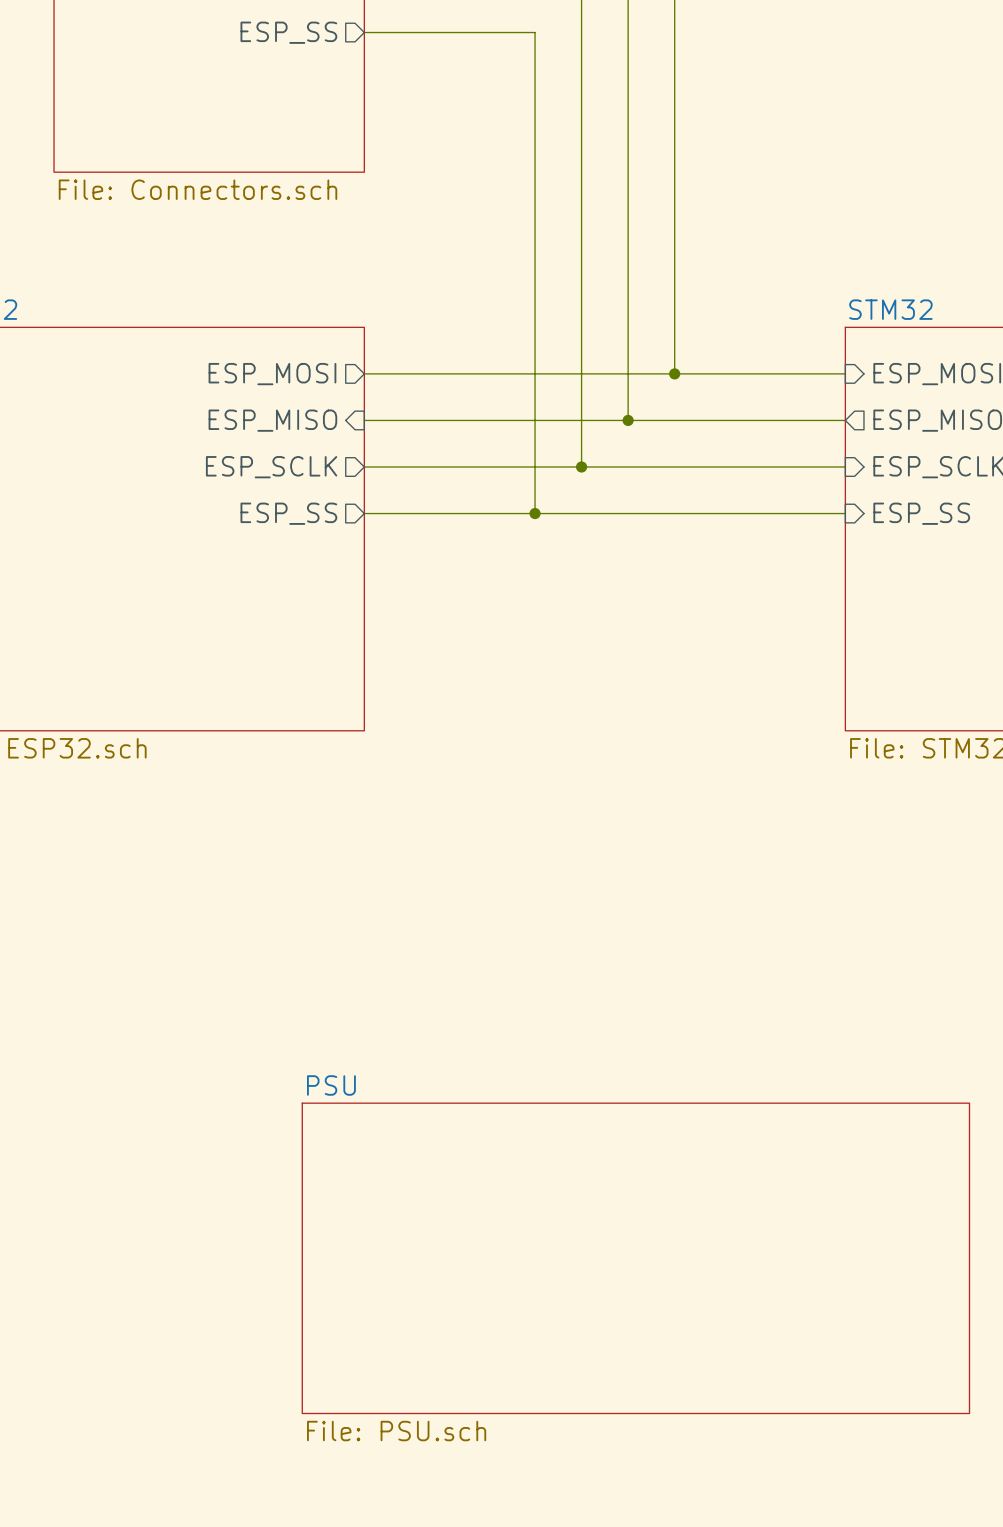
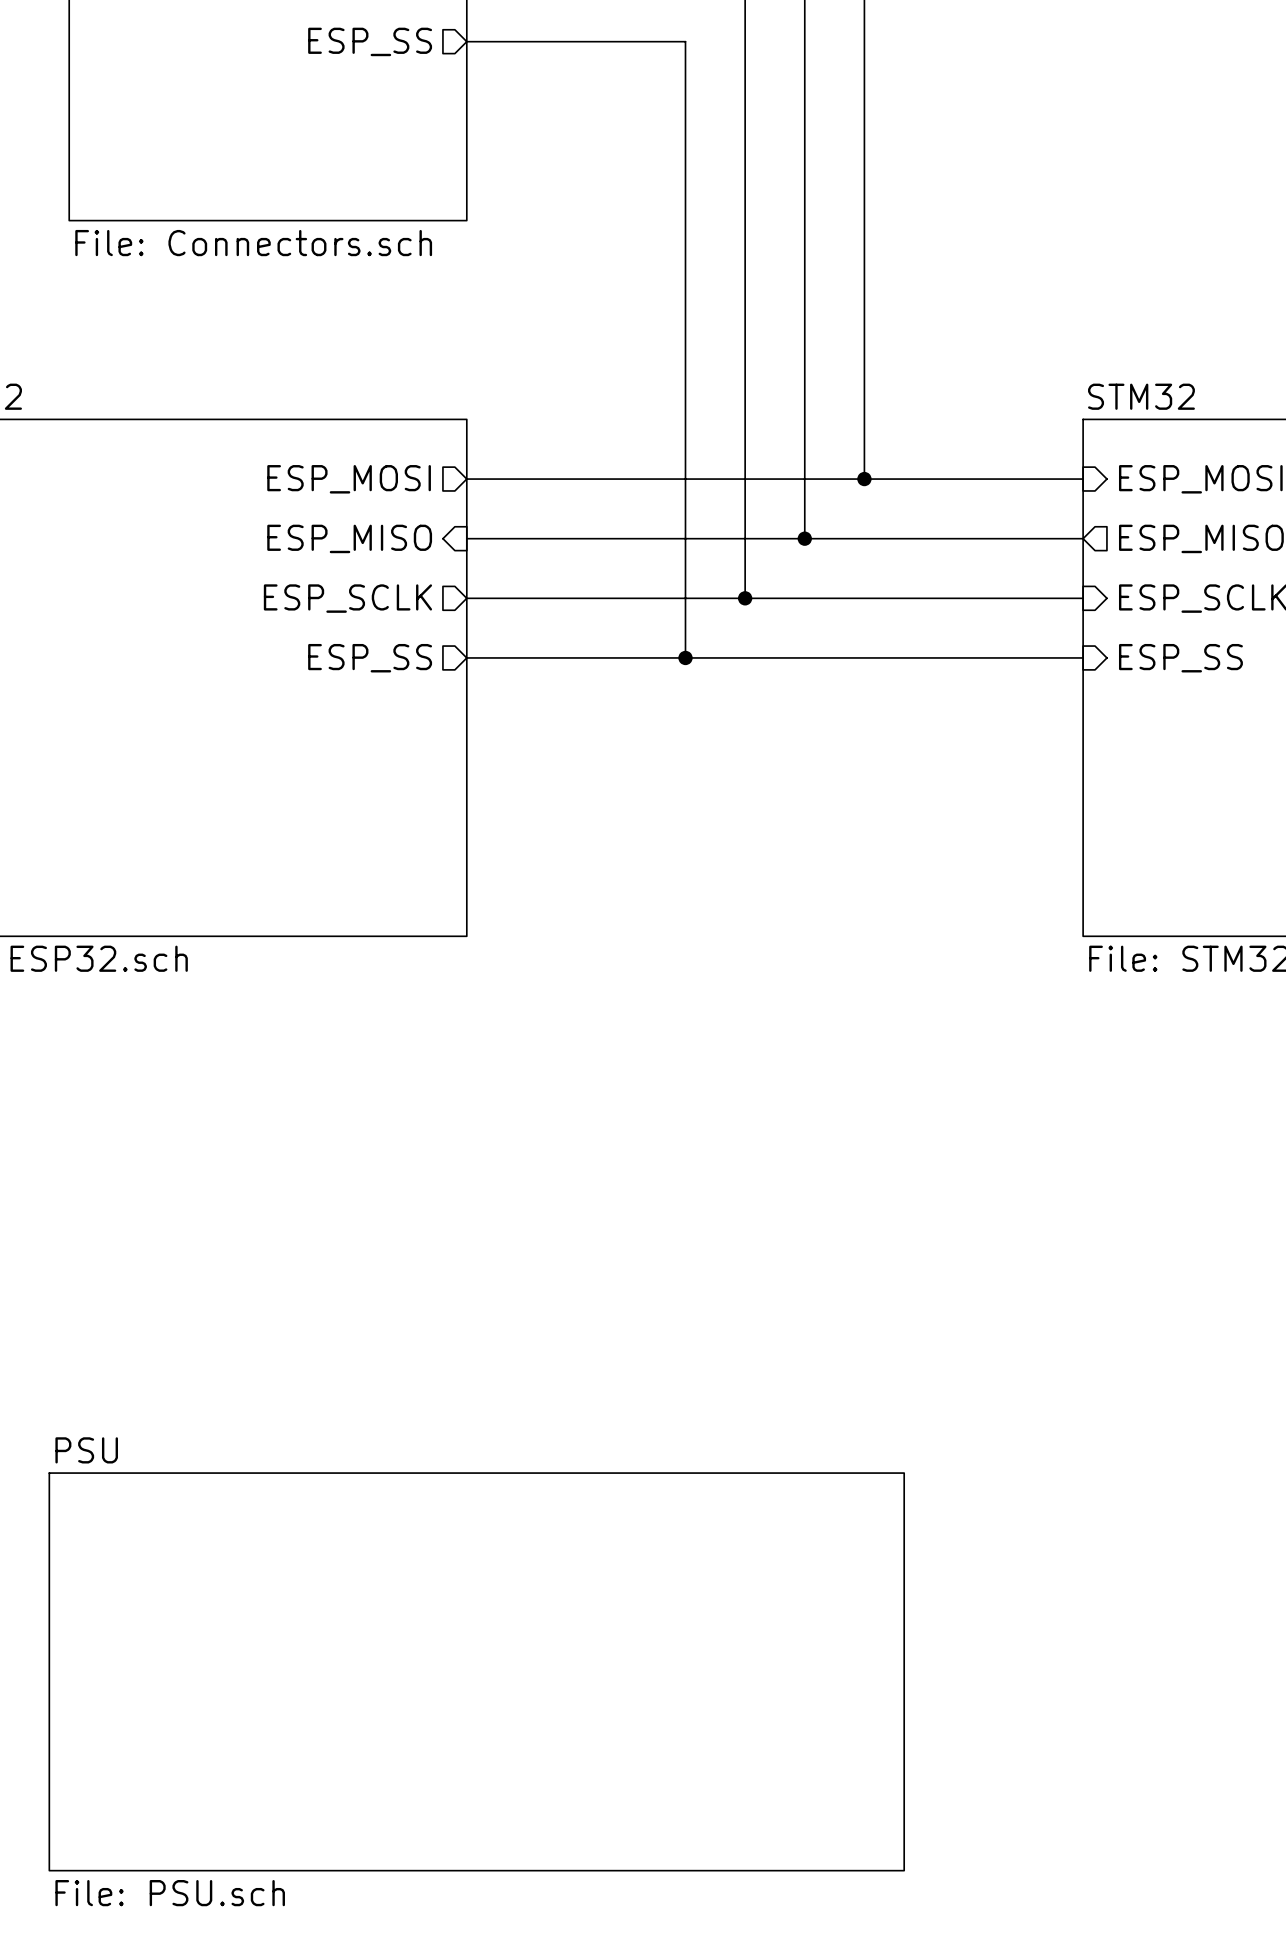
sheet PSU position: (635, 1258) -> (476, 1671)

